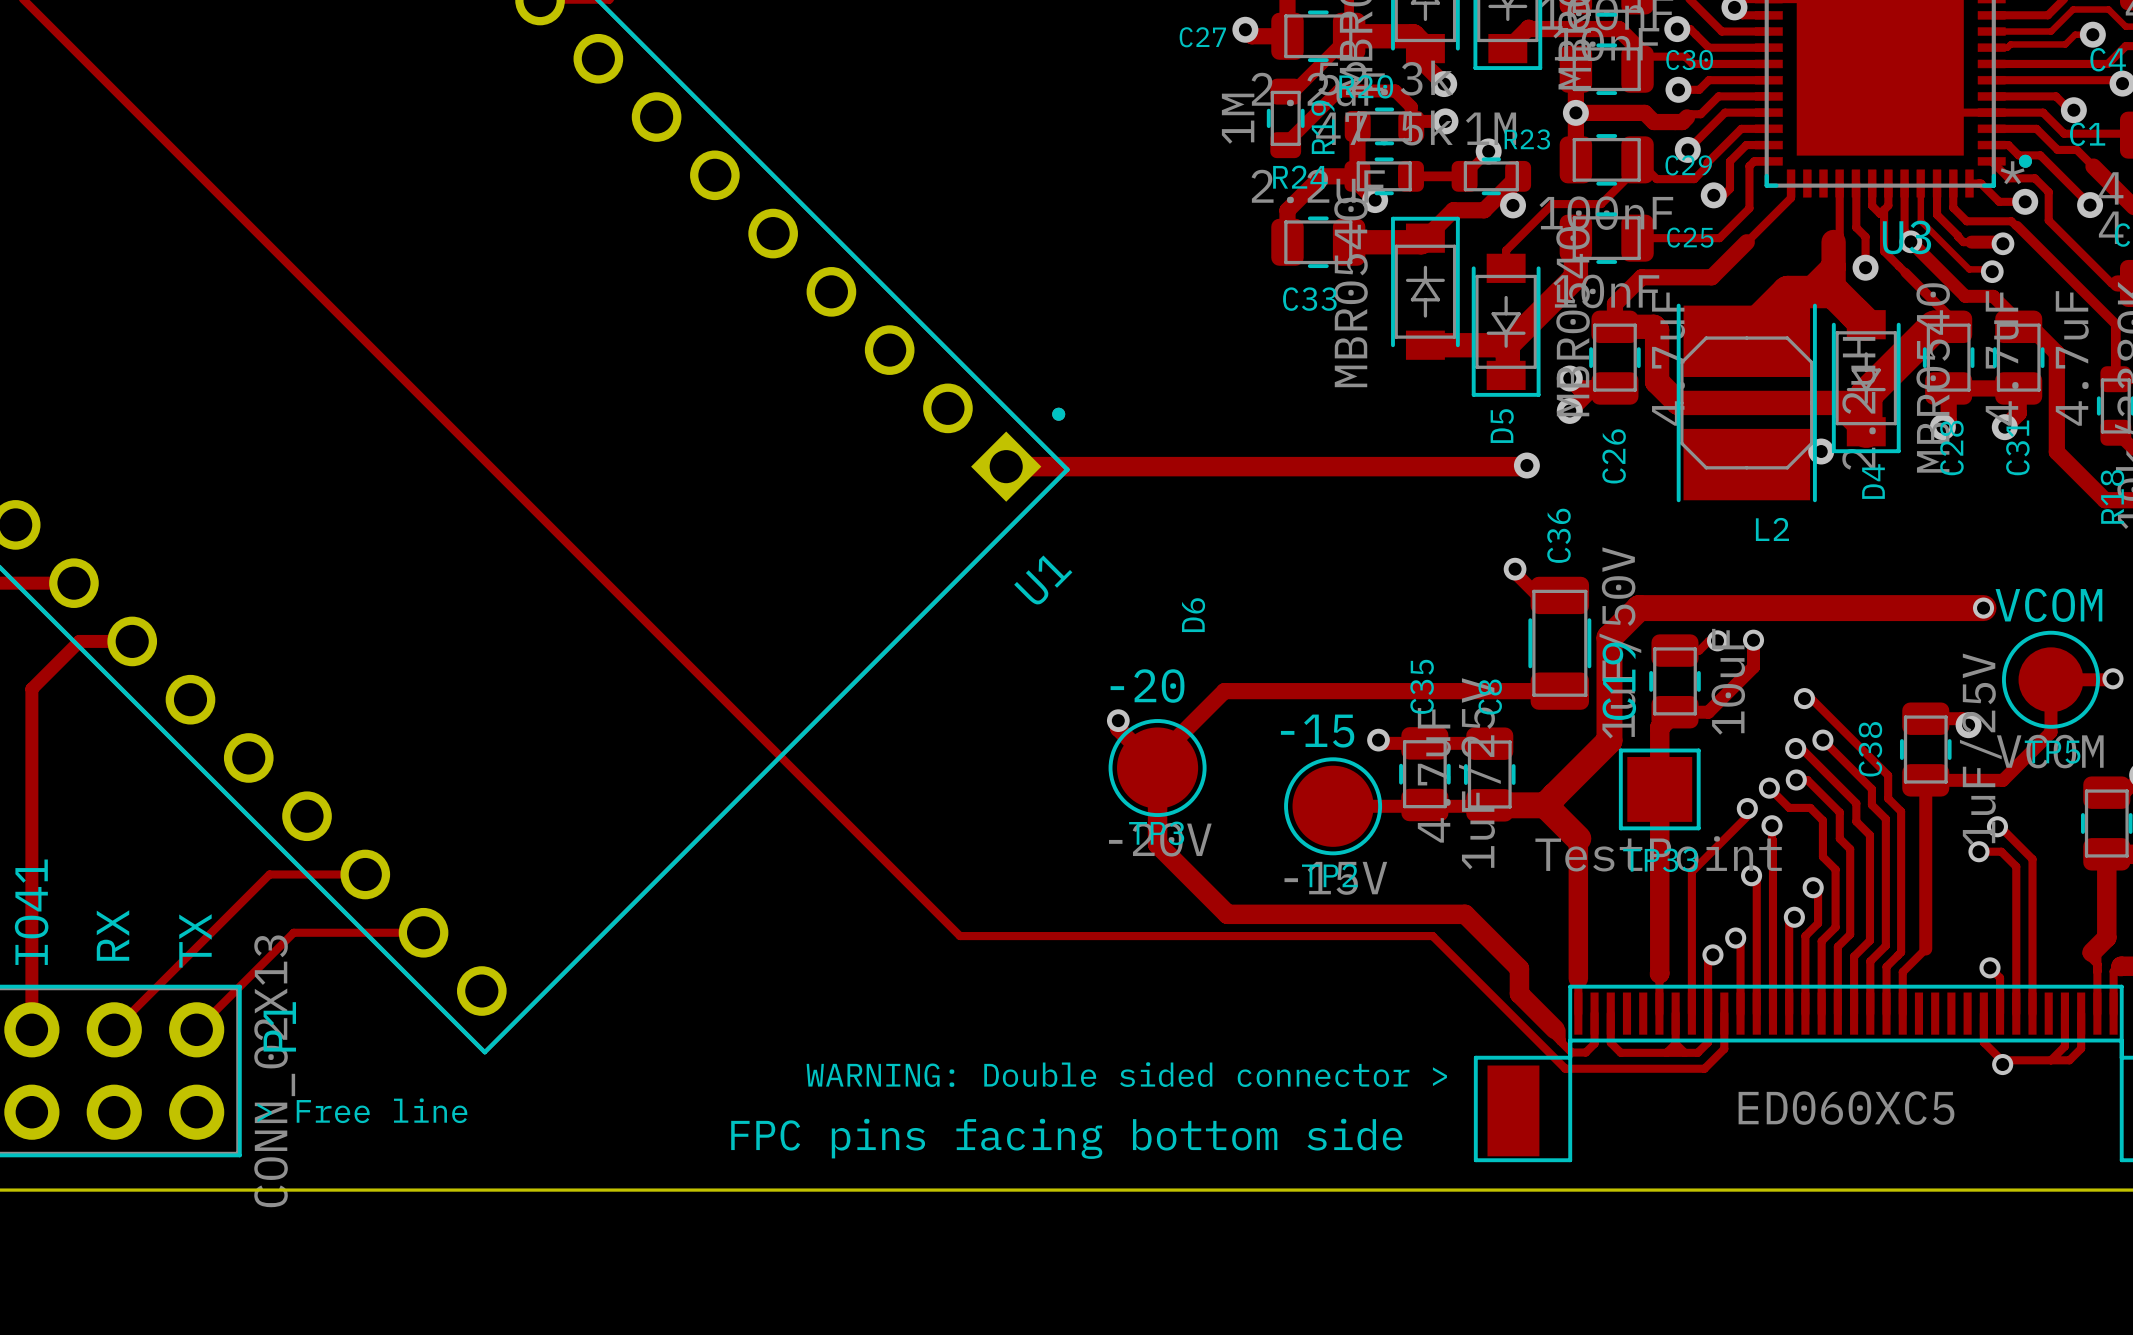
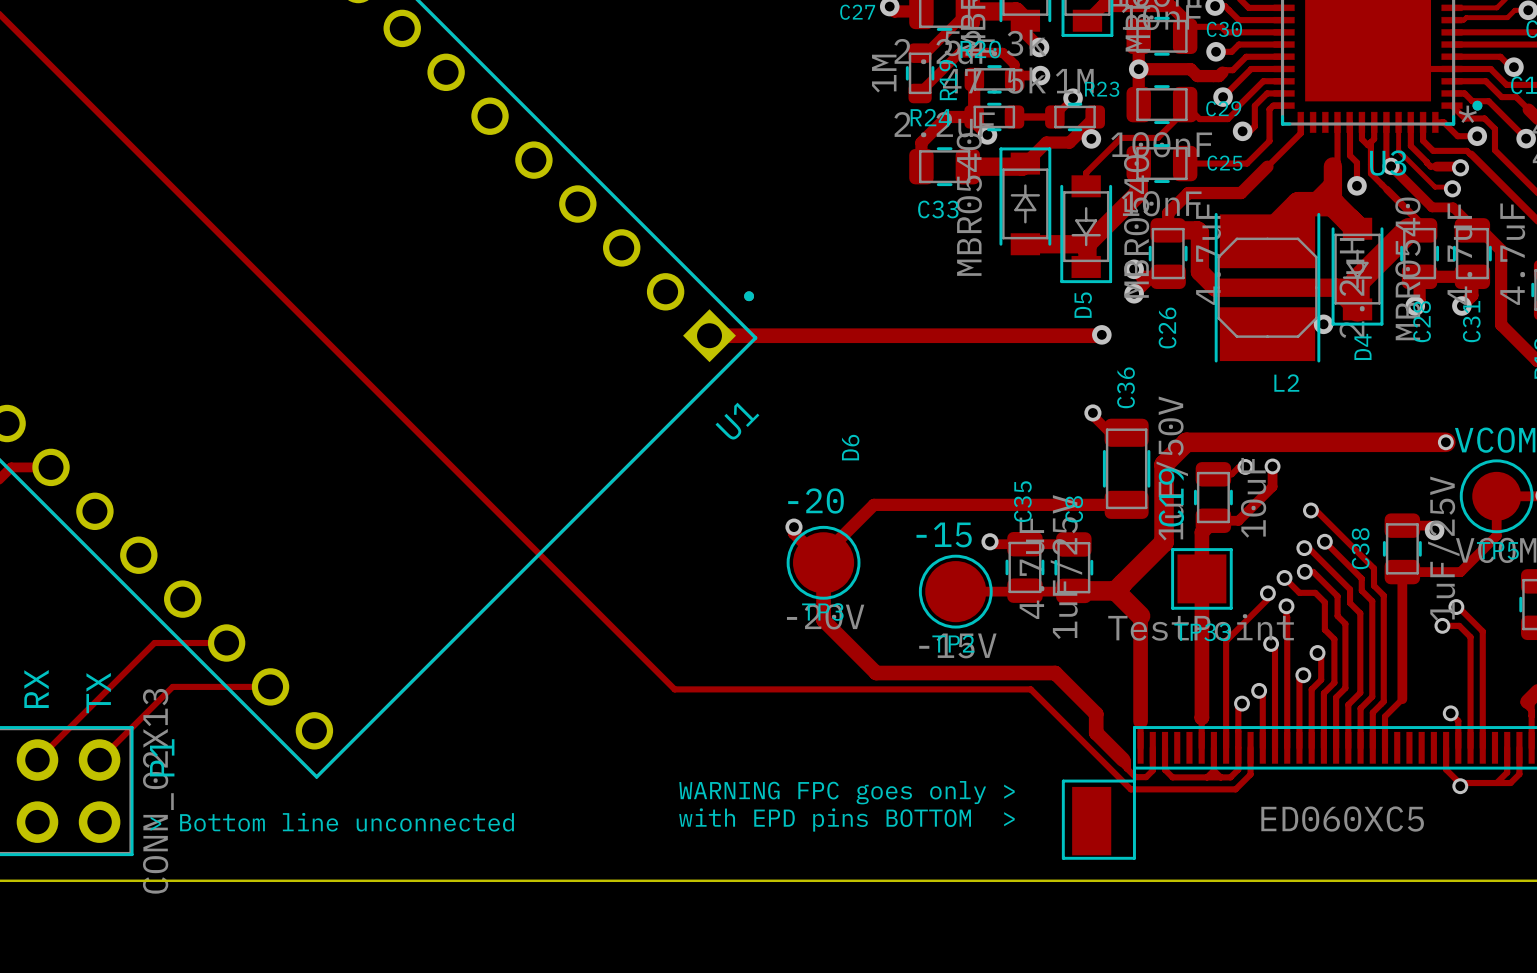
text: none -> WARNING FPC goes only > (847, 792)
text: WARNING: Double sided connector > (1126, 1074) -> none
text: none -> with EPD pins BOTTOM > (846, 819)
text: > Free line (362, 1110) -> none
text: none -> > Bottom line unconnected (332, 822)
text: FPC pins facing bottom side (1066, 1138) -> none

